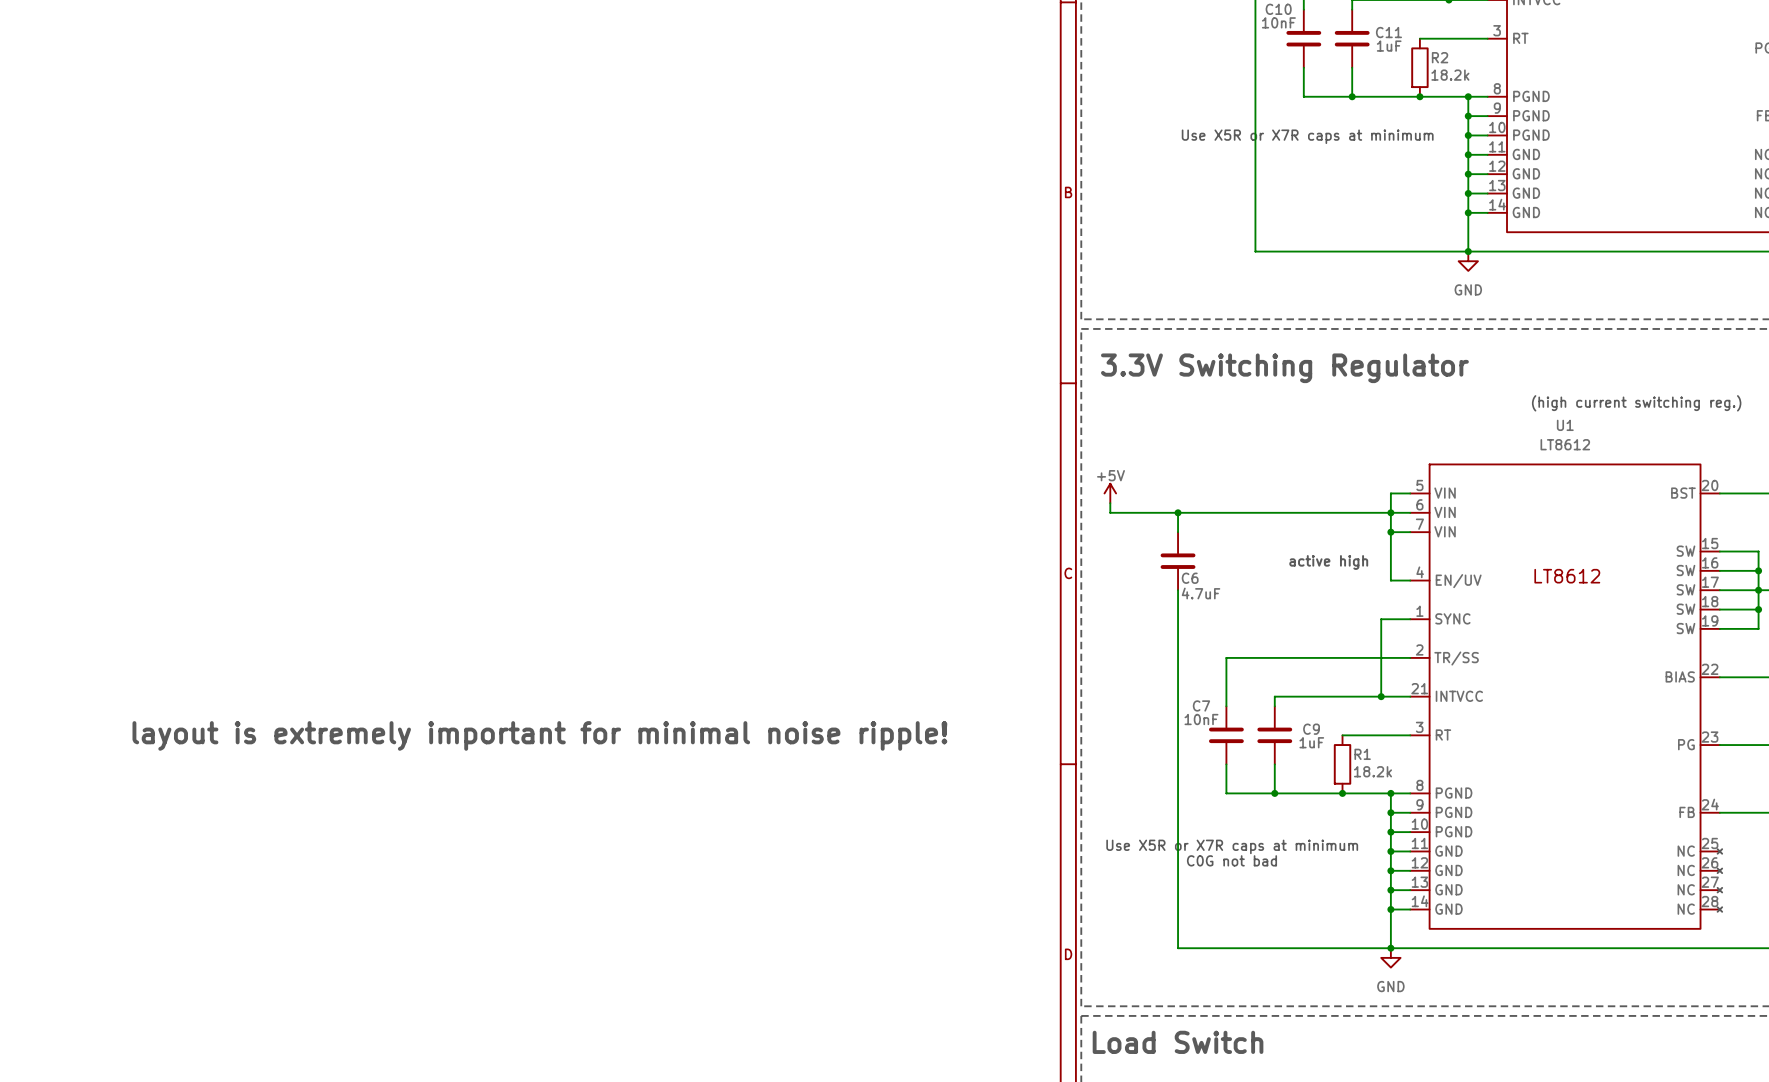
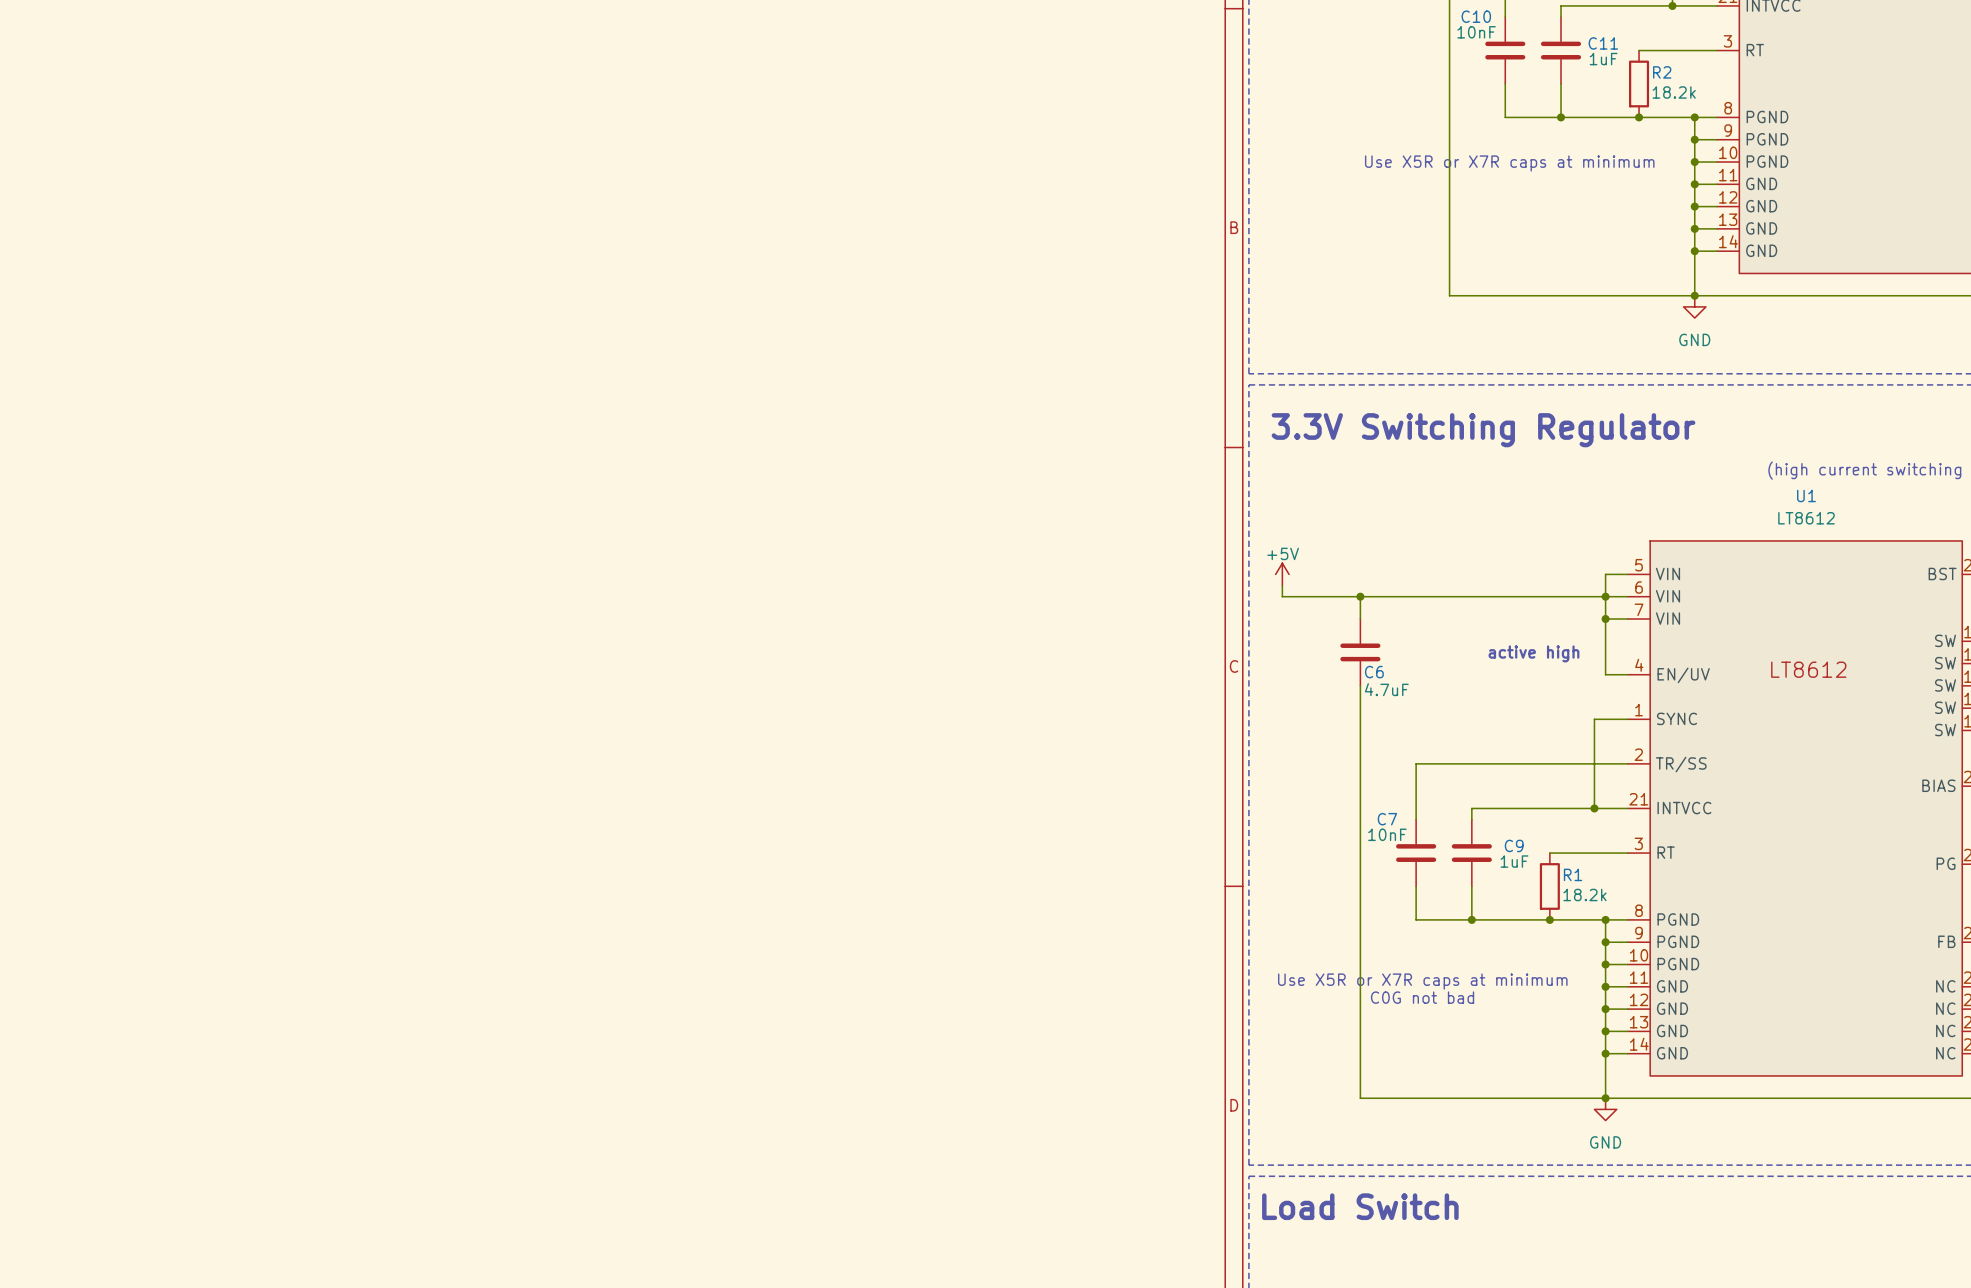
text: layout is extremely important for minimal noise ripple! (539, 735) -> none

